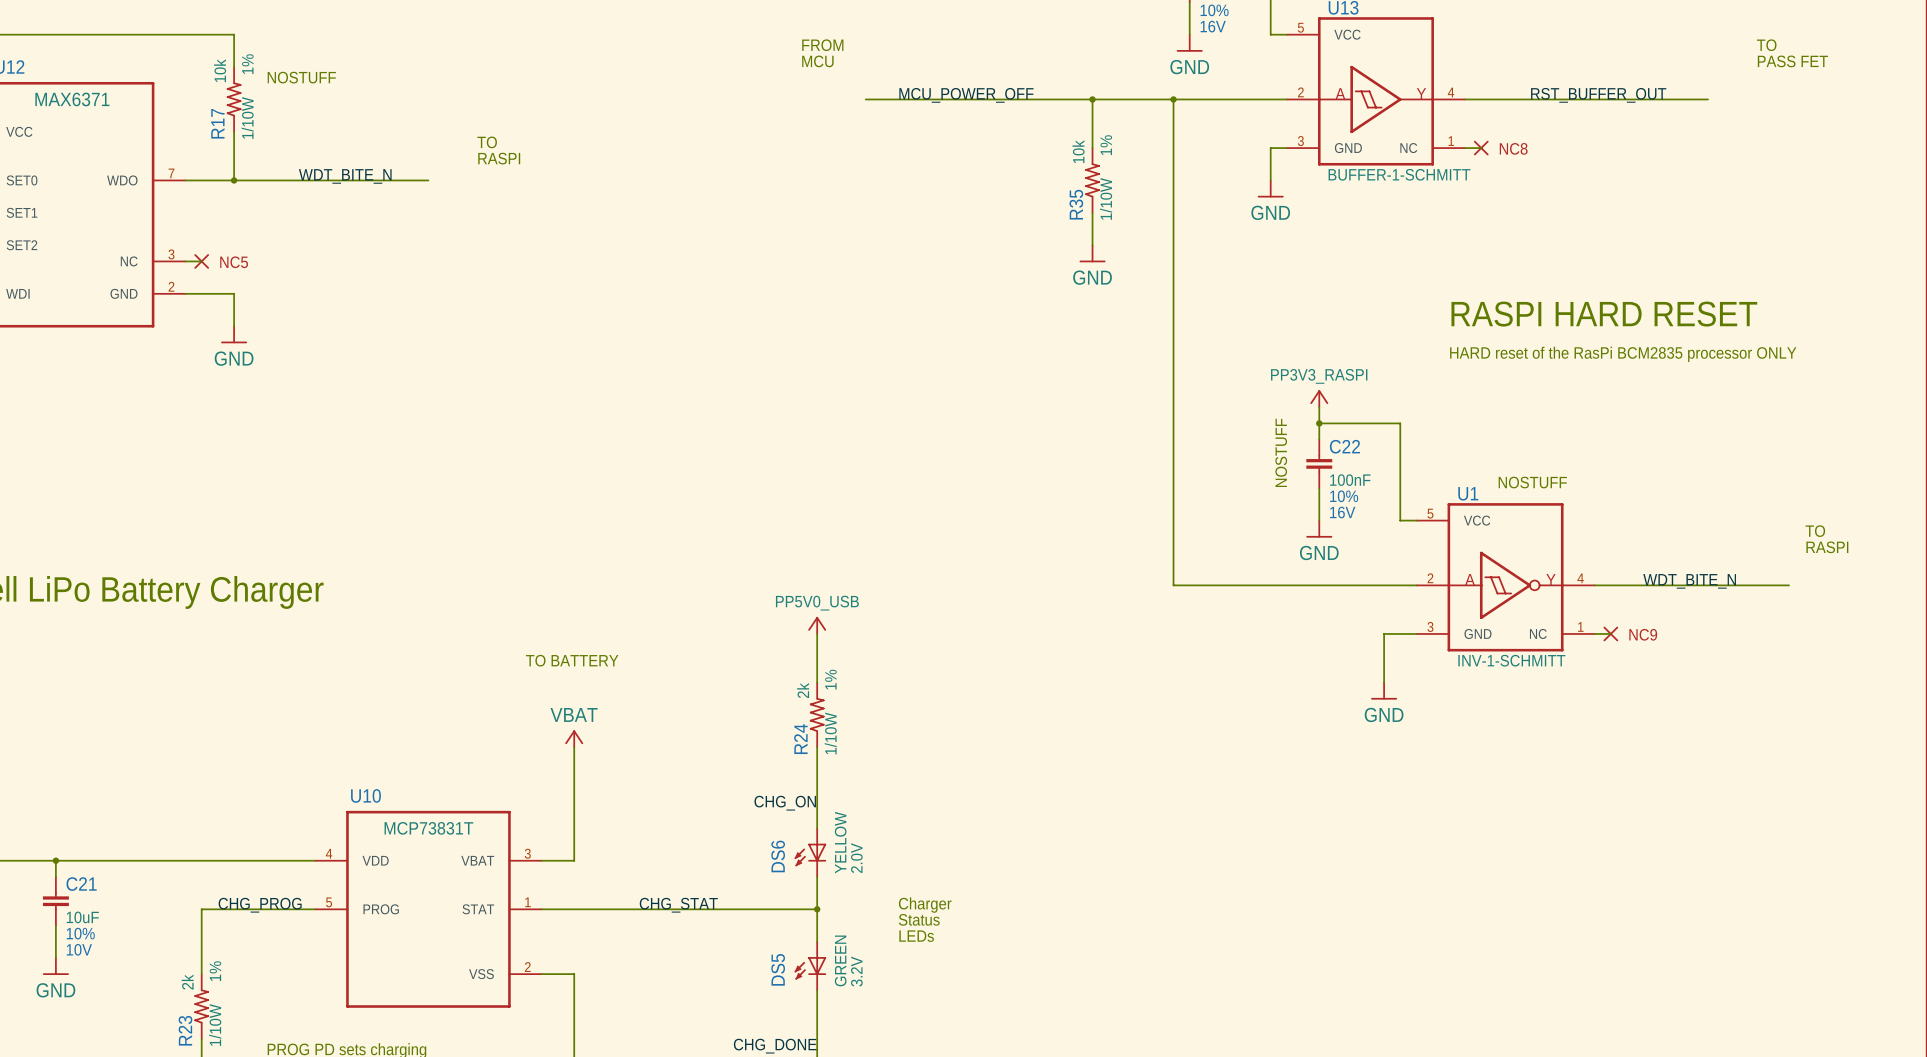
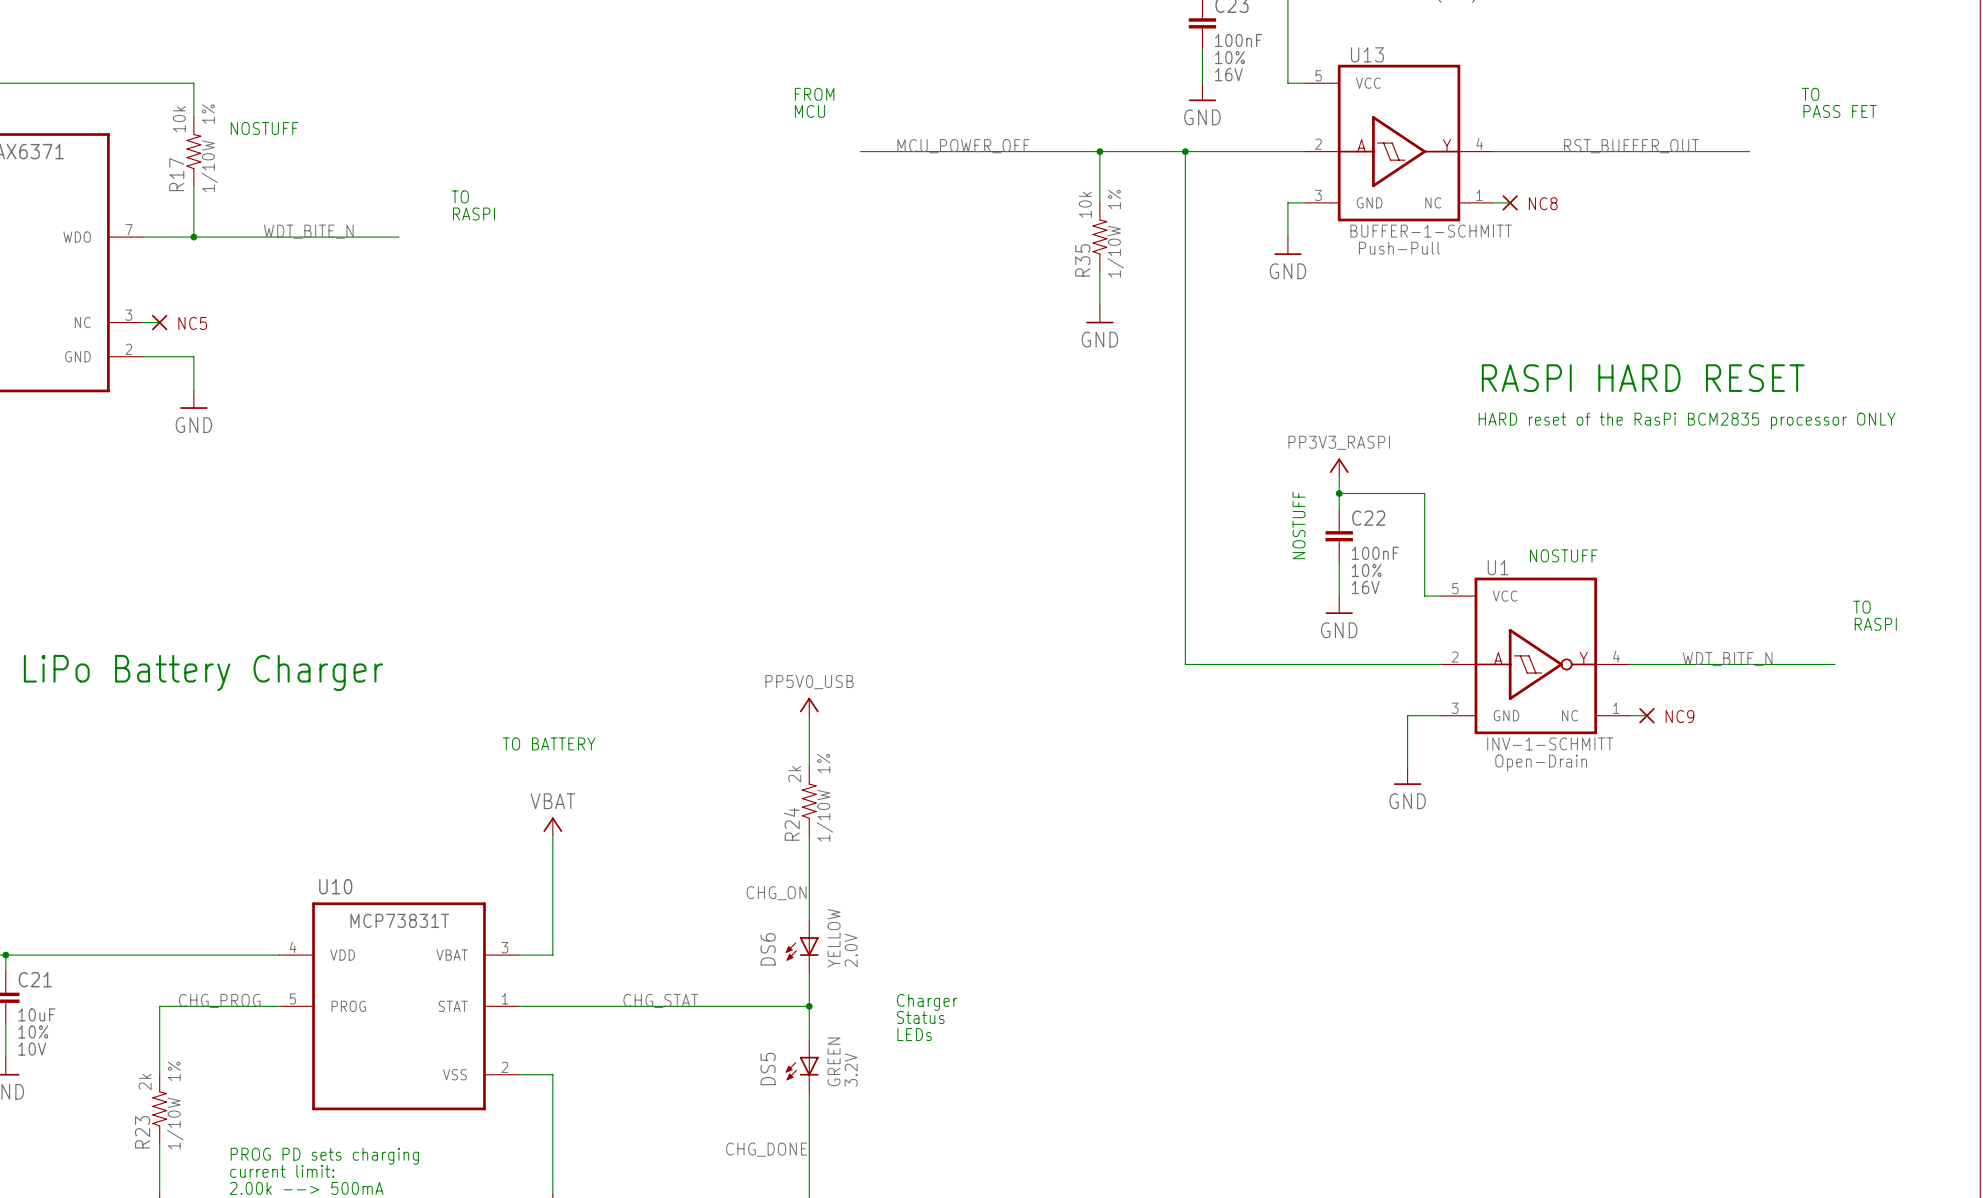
U13 text: none -> Push-Pull (1399, 248)
U1 text: none -> Open-Drain (1541, 763)

